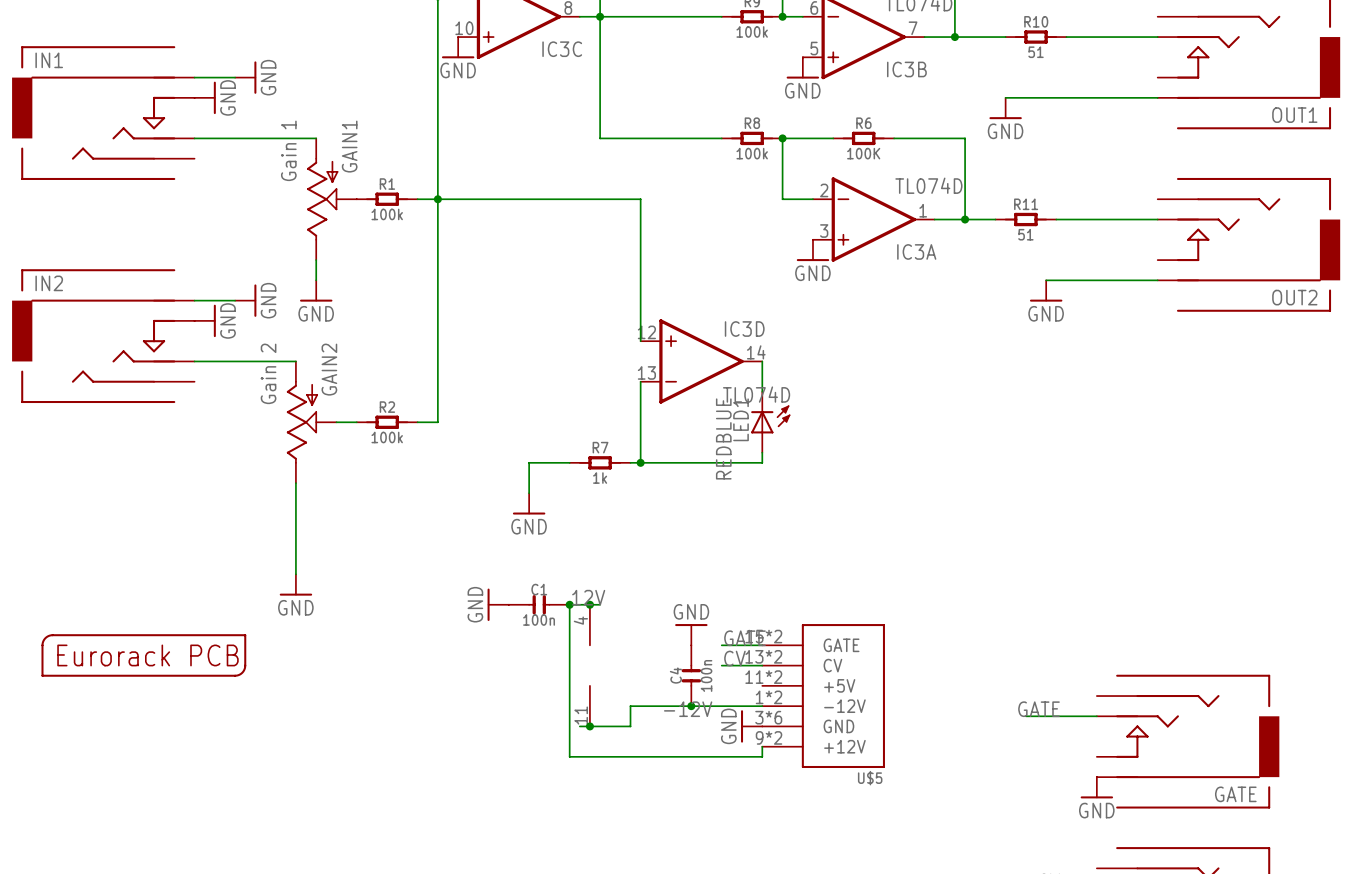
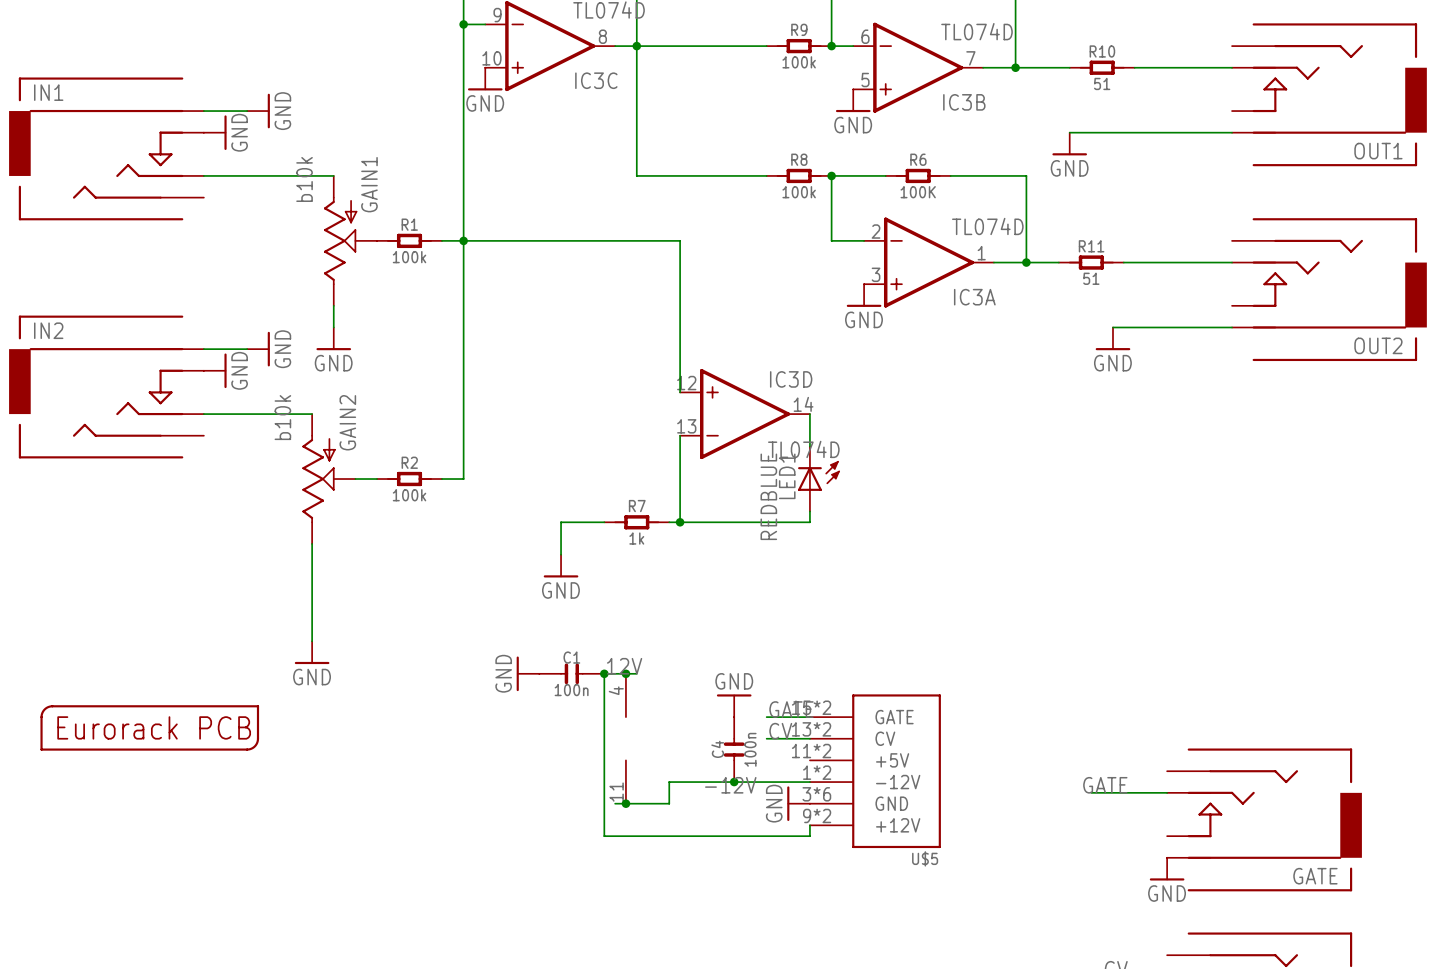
GAIN1 value: Gain 1 (288, 150) -> b10k (304, 179)
GAIN2 value: Gain 2 (268, 373) -> b10k (282, 417)

